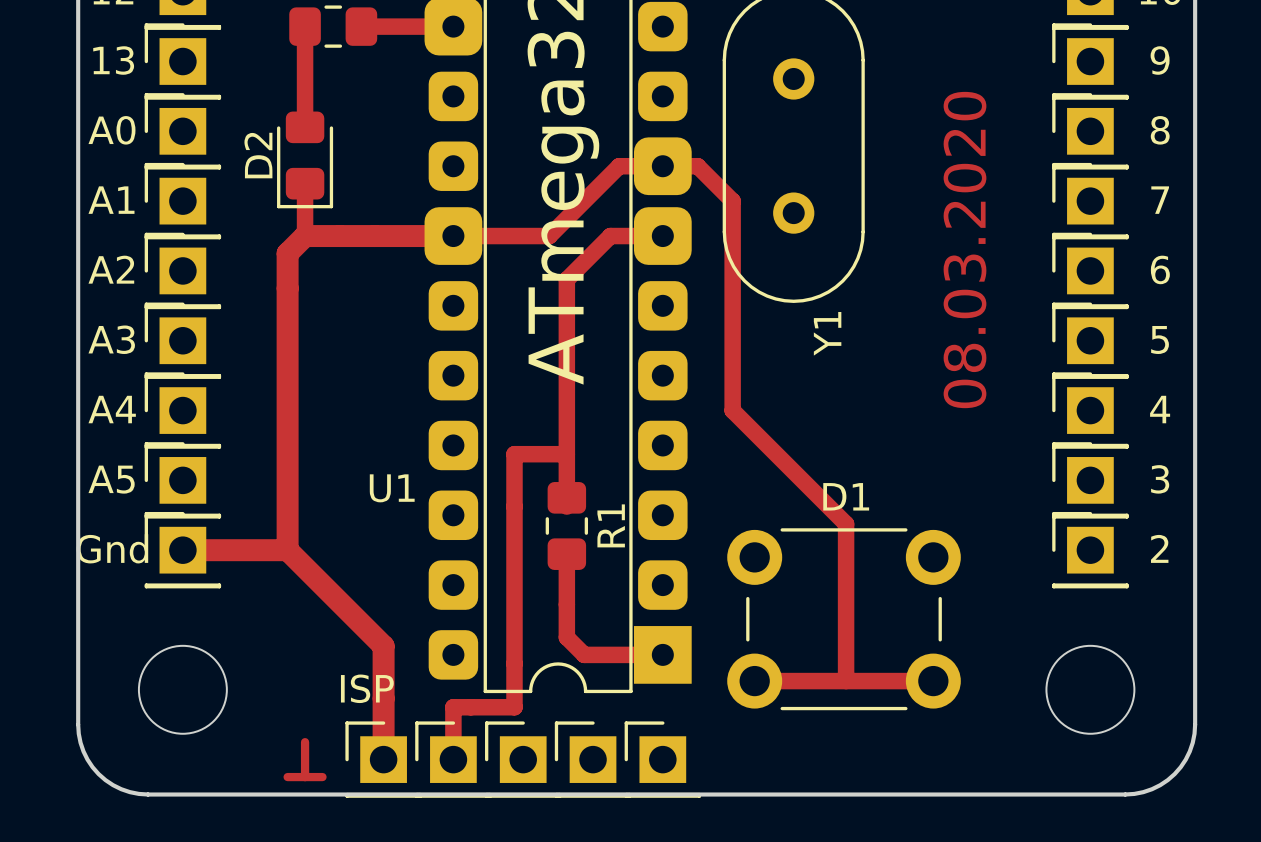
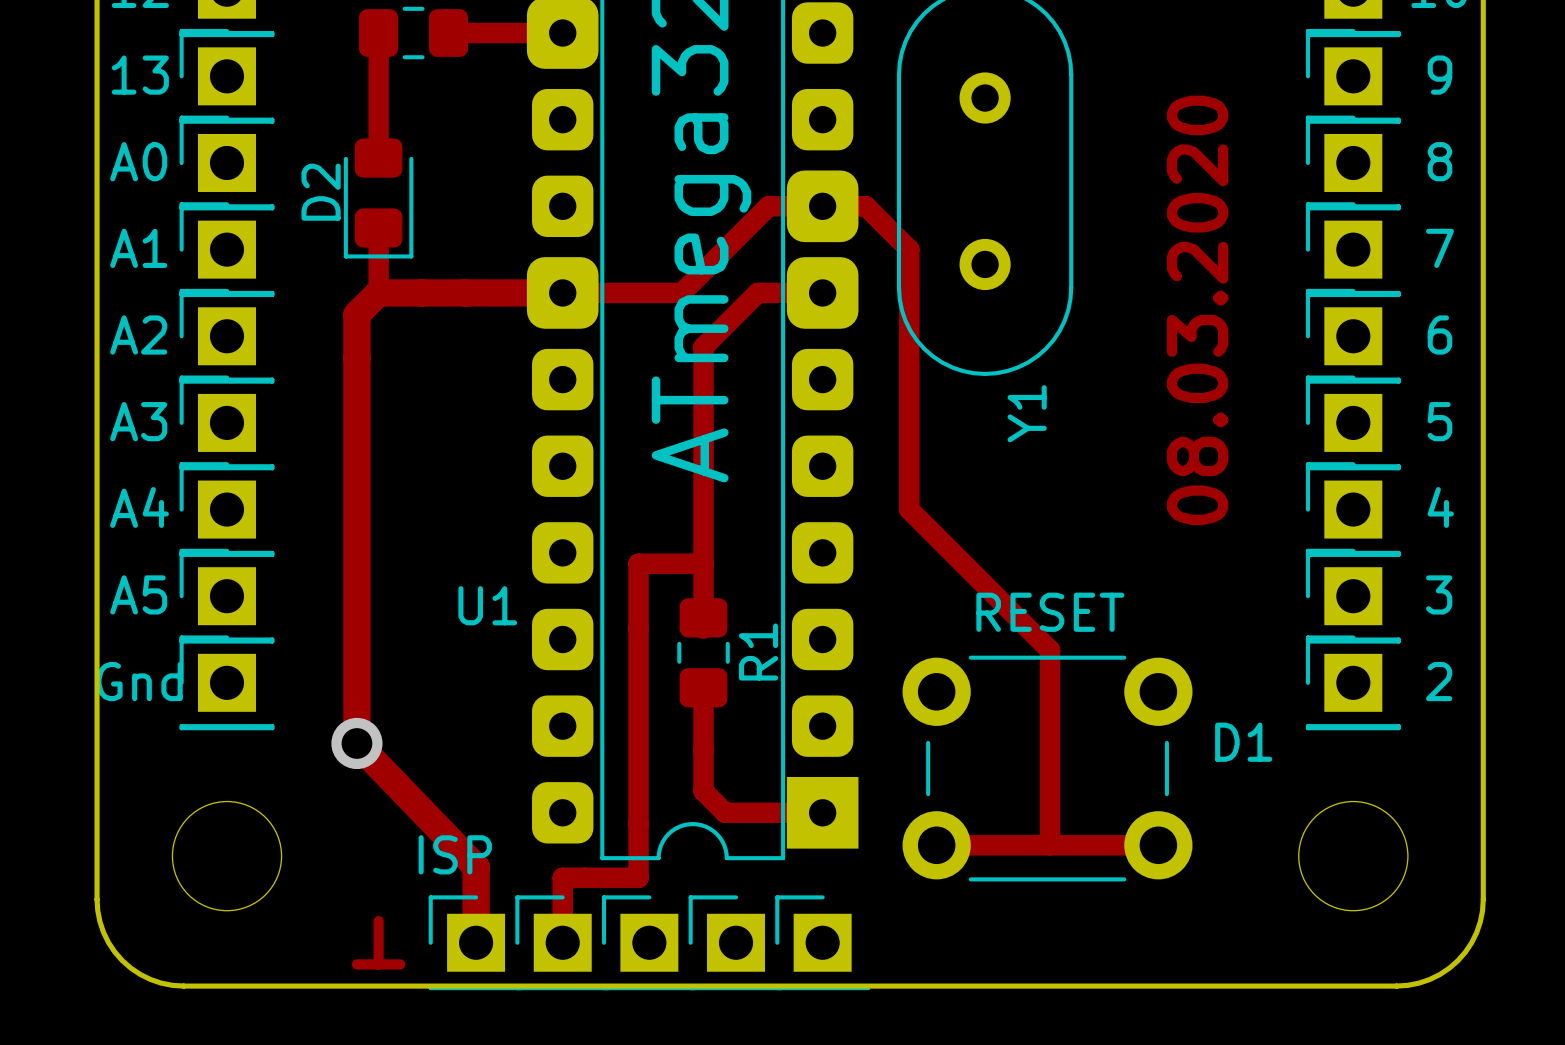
text: none -> RESET (1050, 612)
D1 name position: D1 (846, 496) -> D1 (1243, 742)
track: (182, 550) (287, 550) (383, 646) (383, 698) -> (356, 682) (356, 743) (476, 866)
via: none -> (356, 743)

